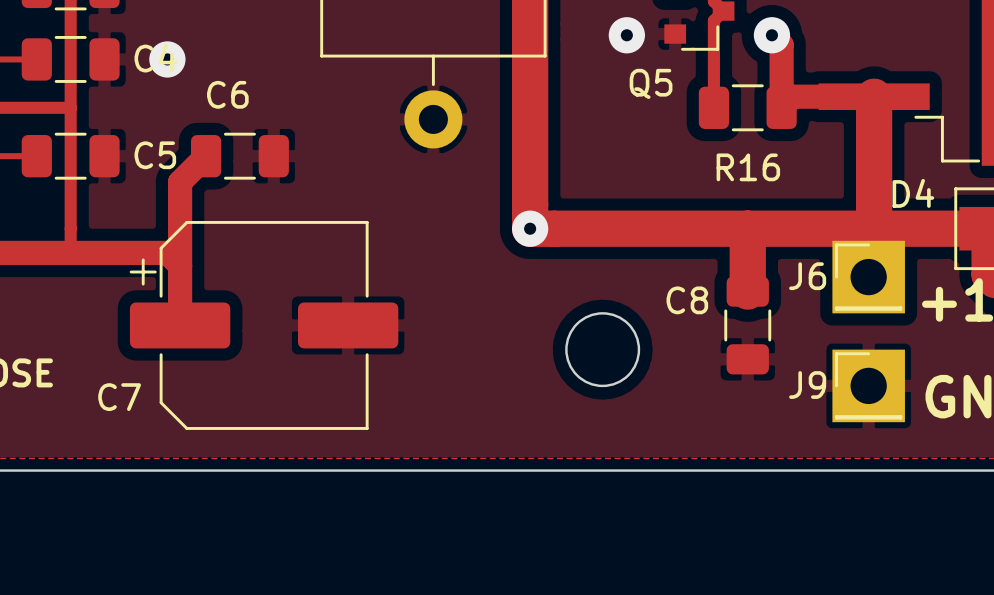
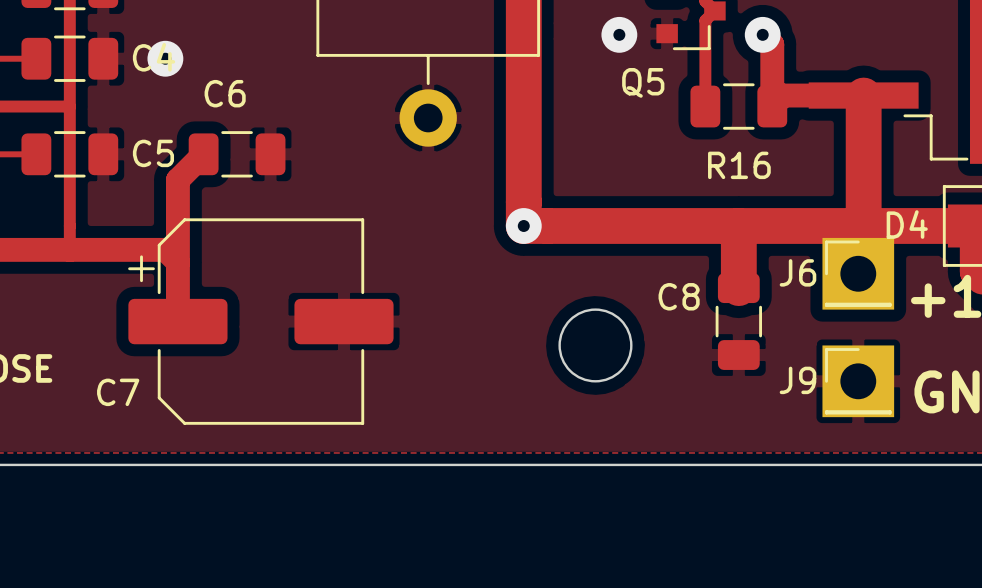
D4 name position: D4 (913, 193) -> D4 (907, 224)

